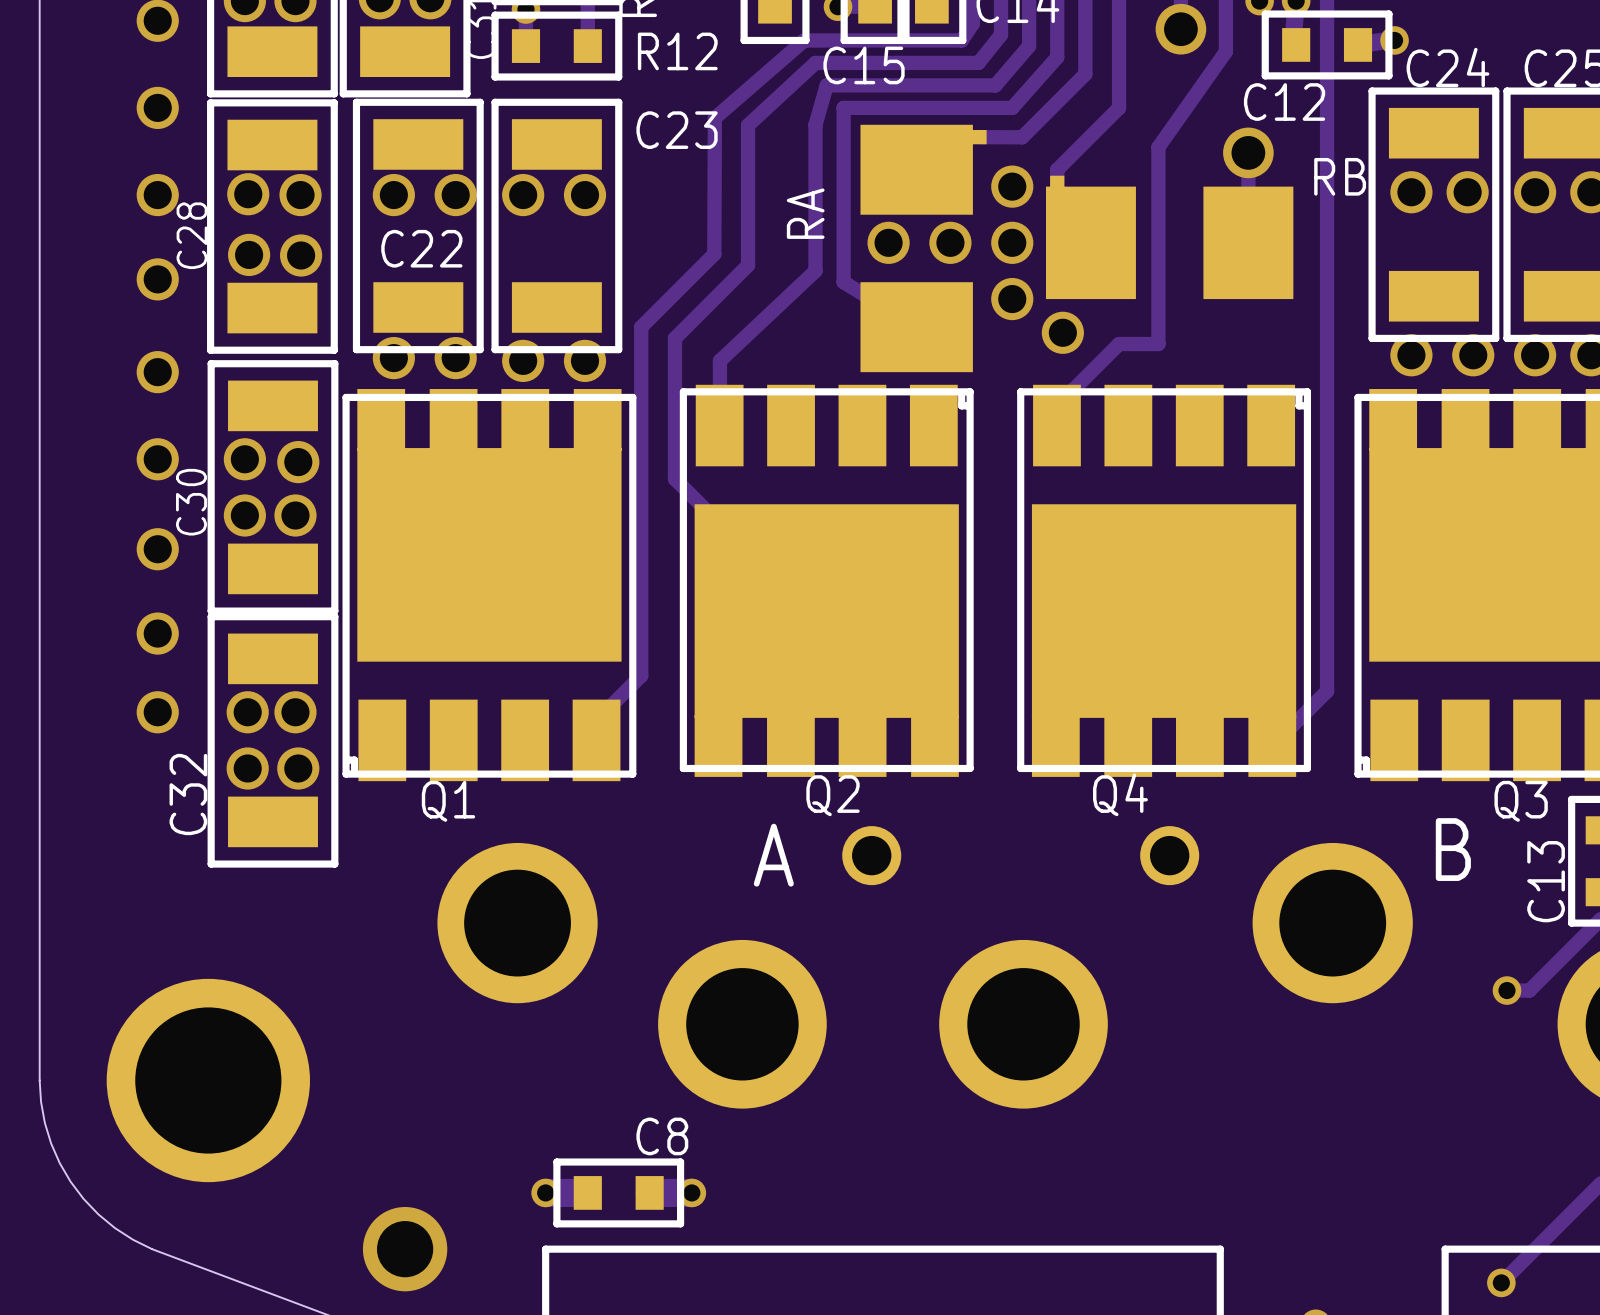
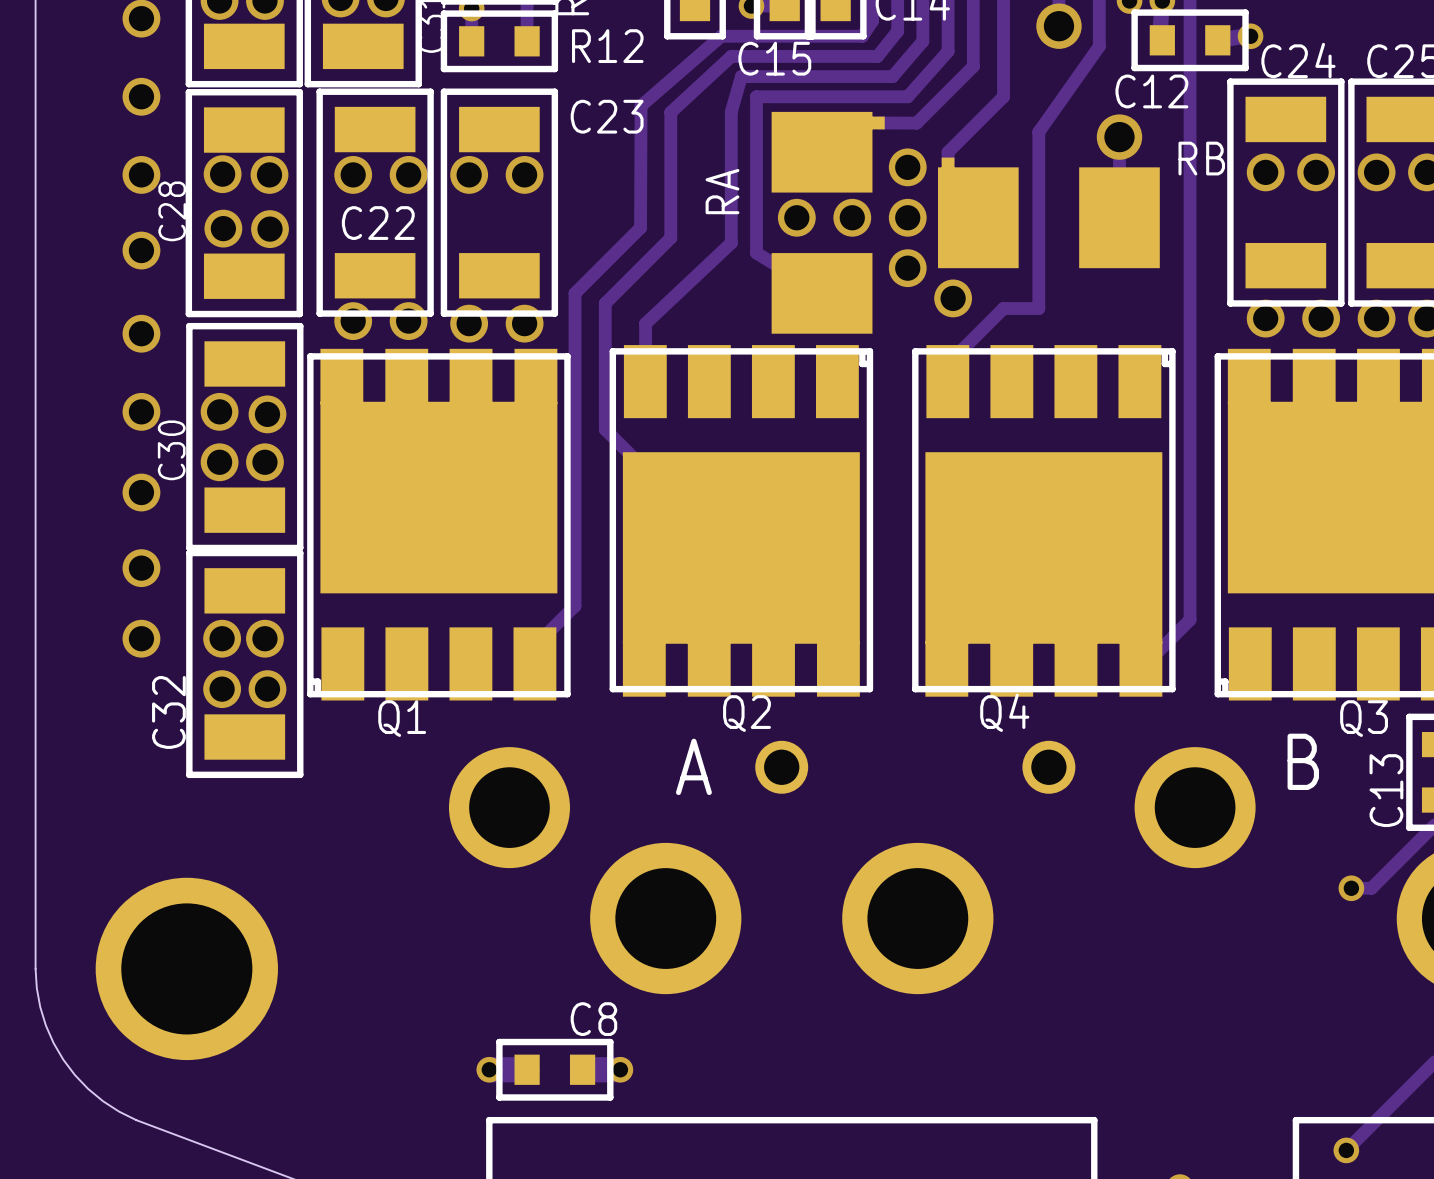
part footprint: [437, 842, 598, 1004] -> [448, 747, 570, 869]
part footprint: [1252, 842, 1413, 1004] -> [1134, 747, 1256, 869]
via: (405, 1249) -> none

